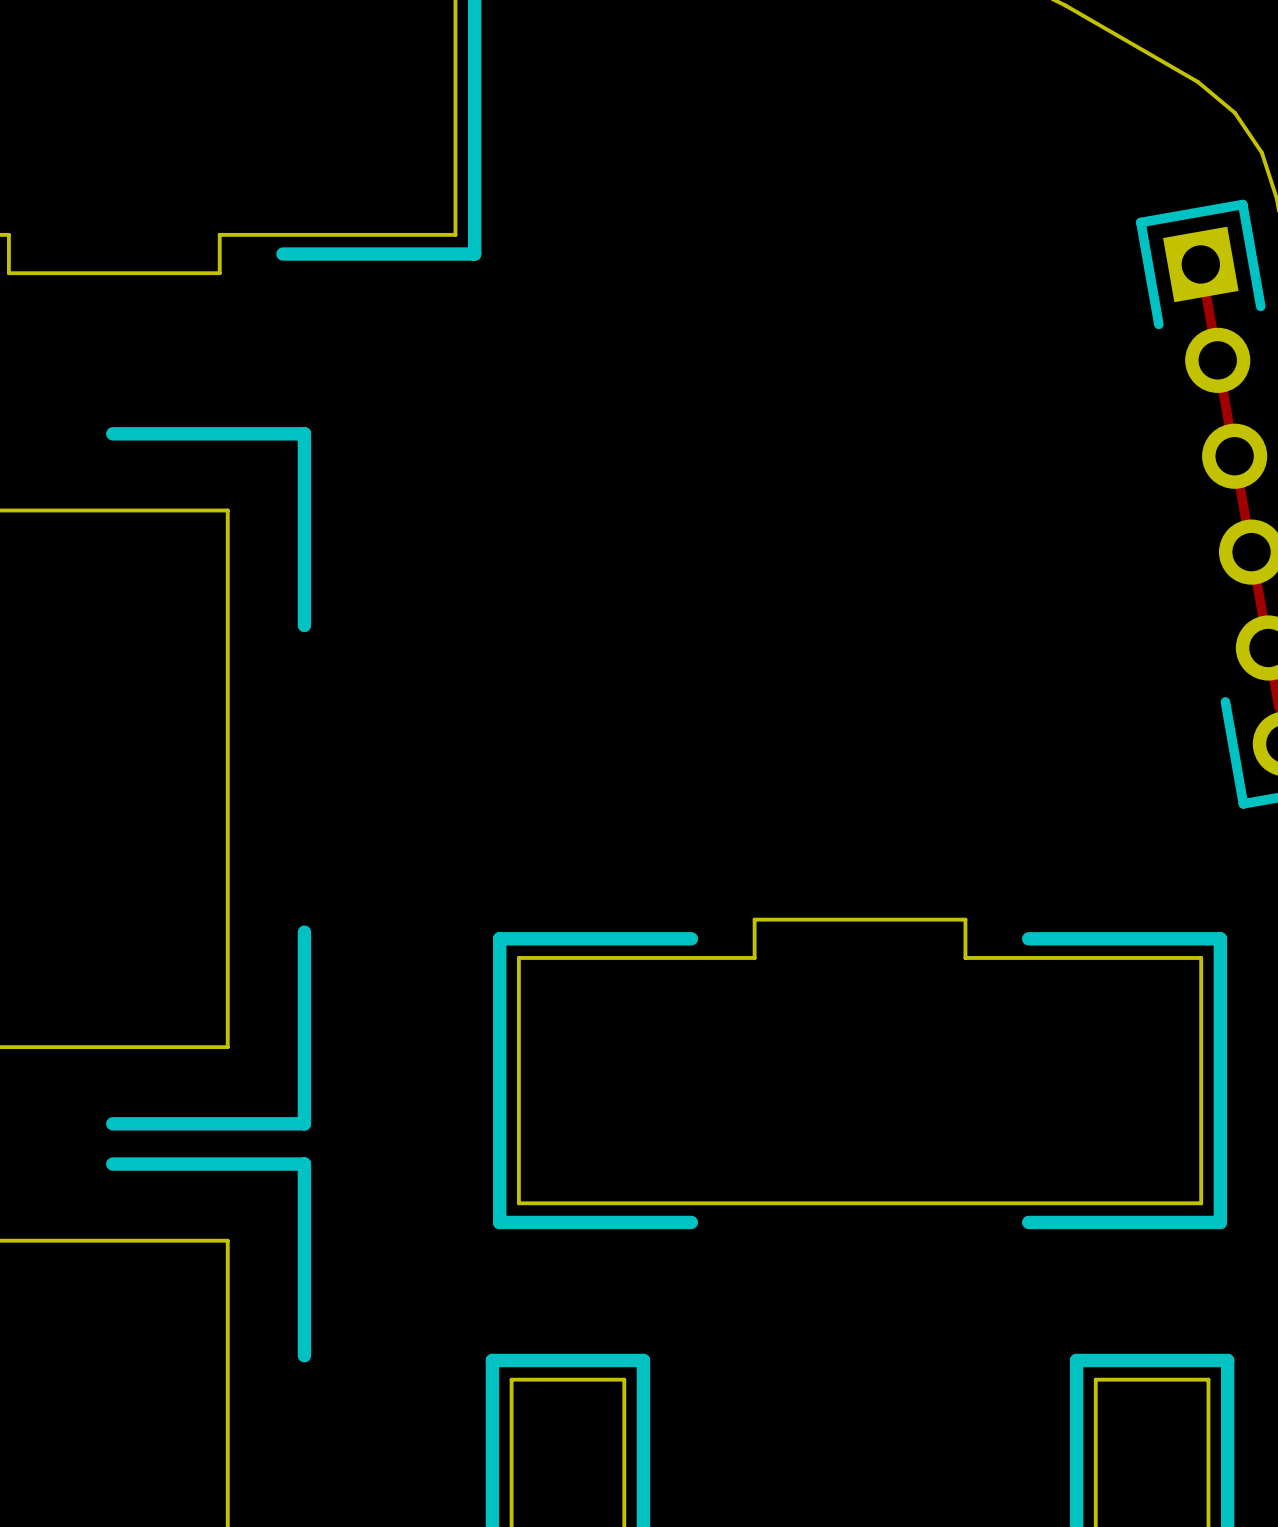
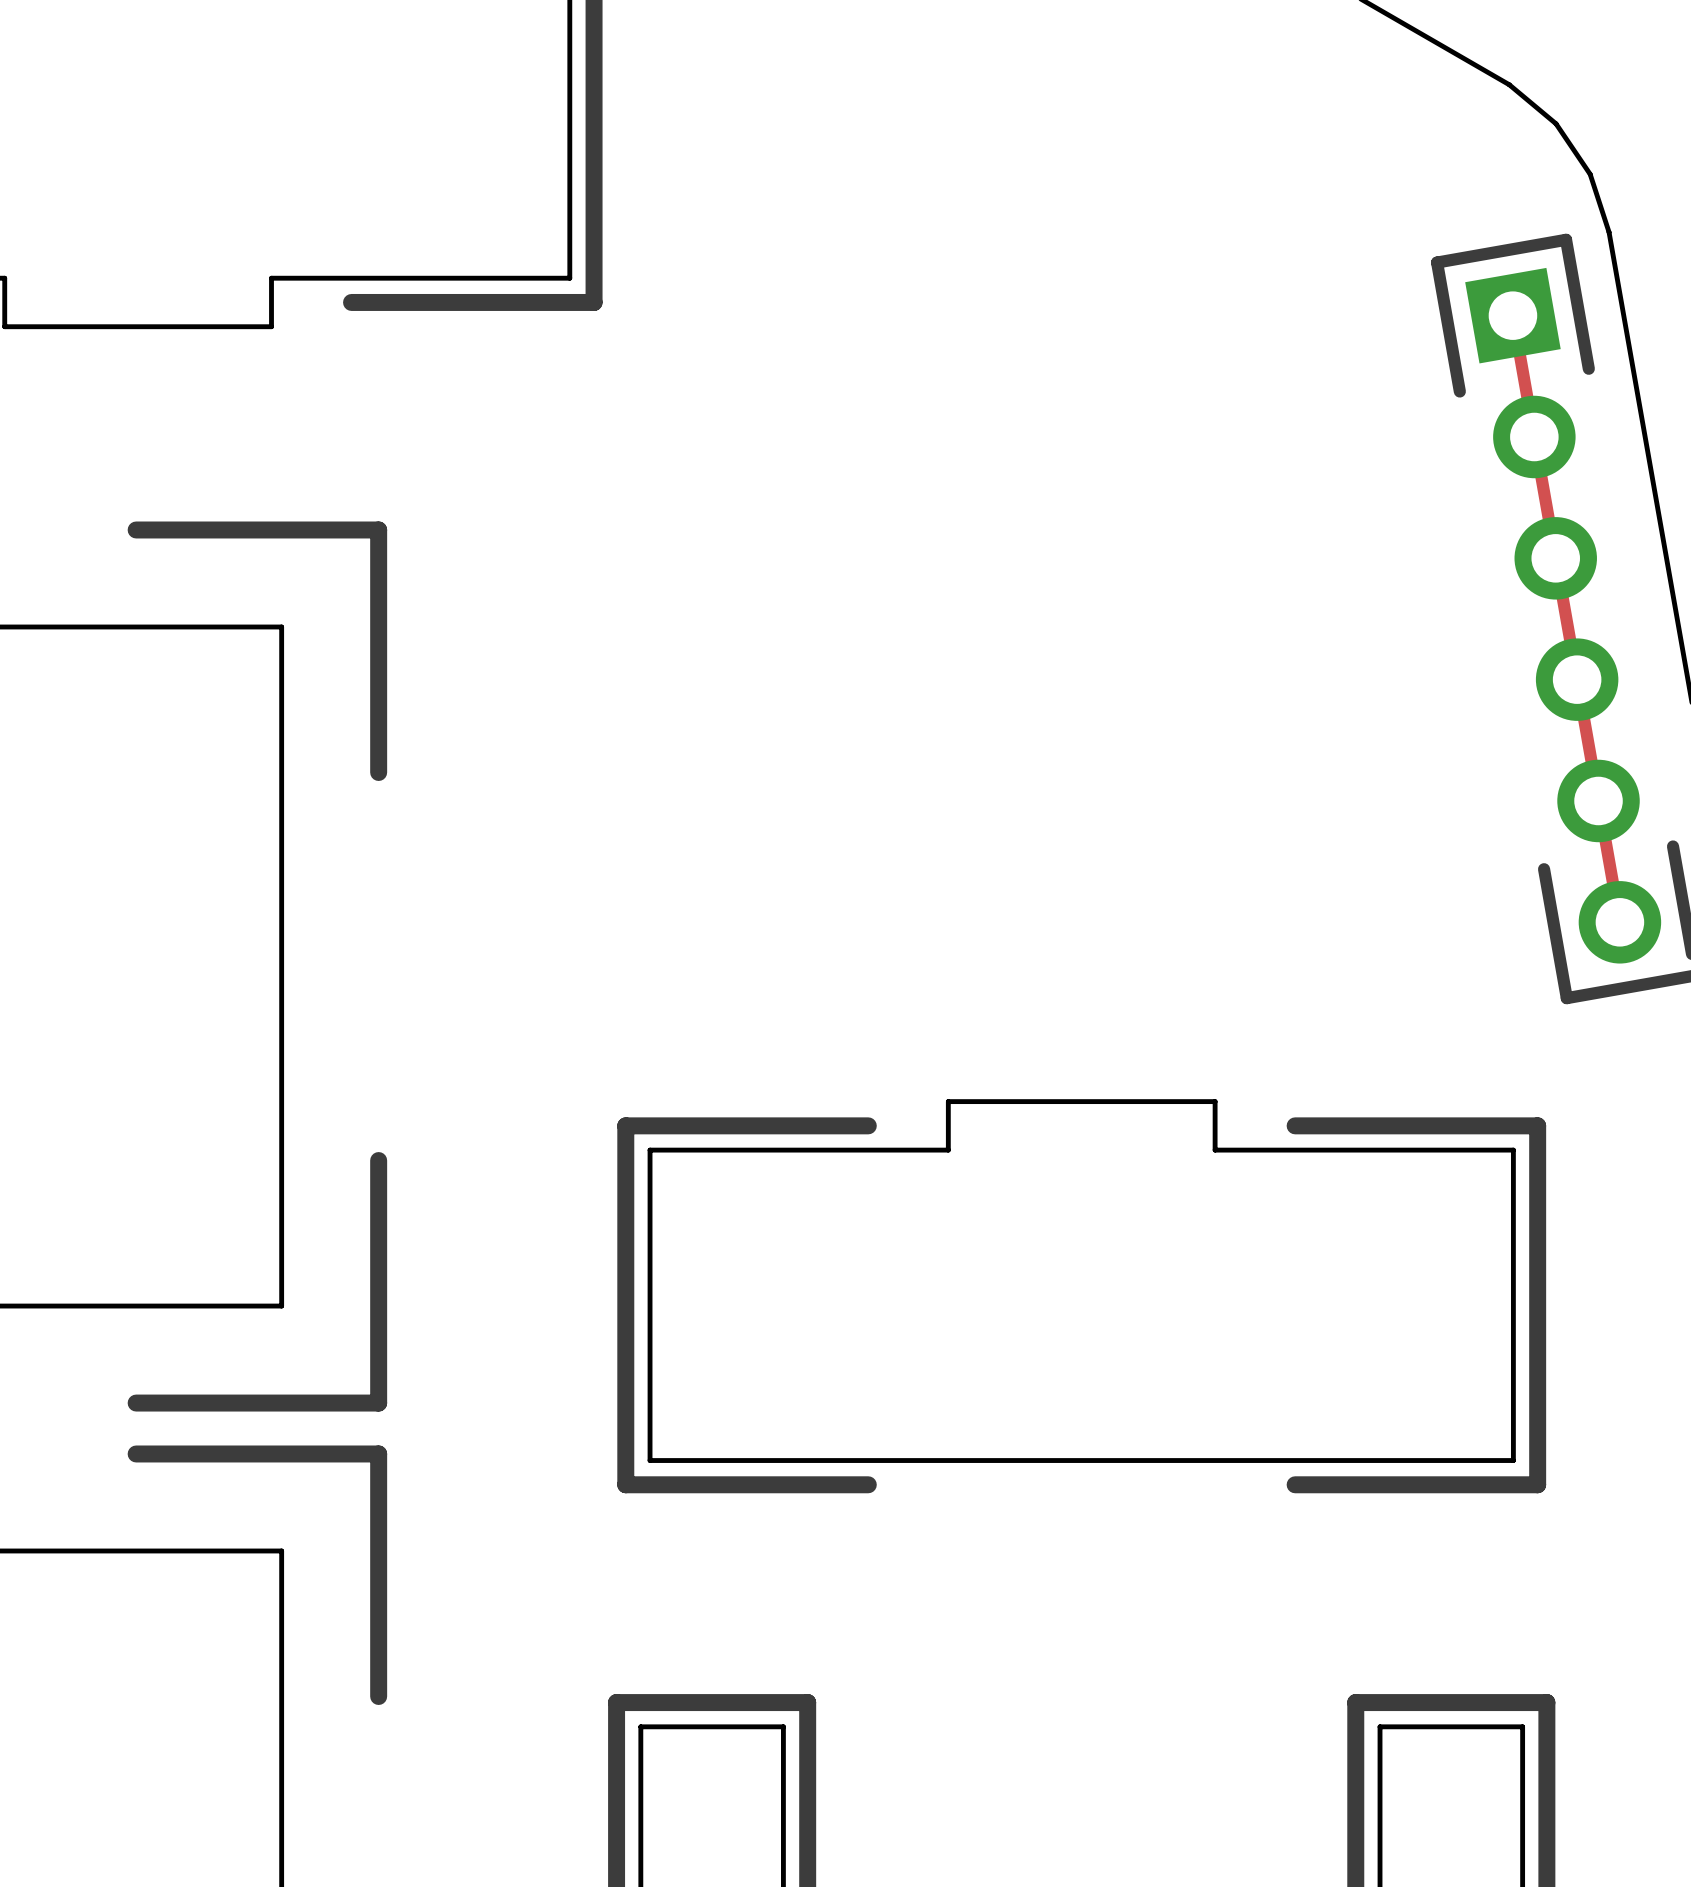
board edge: (754, 919) (965, 919) -> (948, 1144) (948, 1101) (1215, 1101) (1215, 1144)
board edge: (754, 923) (754, 957) (518, 957) -> (948, 1150) (650, 1150) (650, 1193)
board edge: (965, 923) (965, 957) (1201, 957) -> (1215, 1150) (1513, 1150) (1513, 1193)
line: (499, 938) (691, 938) -> (625, 1168) (625, 1125) (868, 1125)
line: (1028, 938) (1220, 938) -> (1295, 1125) (1537, 1125) (1537, 1168)
board edge: (518, 1169) (518, 1203) (1201, 1203) (1201, 1169) -> (650, 1460) (1513, 1460)
line: (499, 1188) (499, 1222) (691, 1222) -> (625, 1484) (868, 1484)
line: (1220, 1188) (1220, 1222) (1028, 1222) -> (1537, 1484) (1295, 1484)

